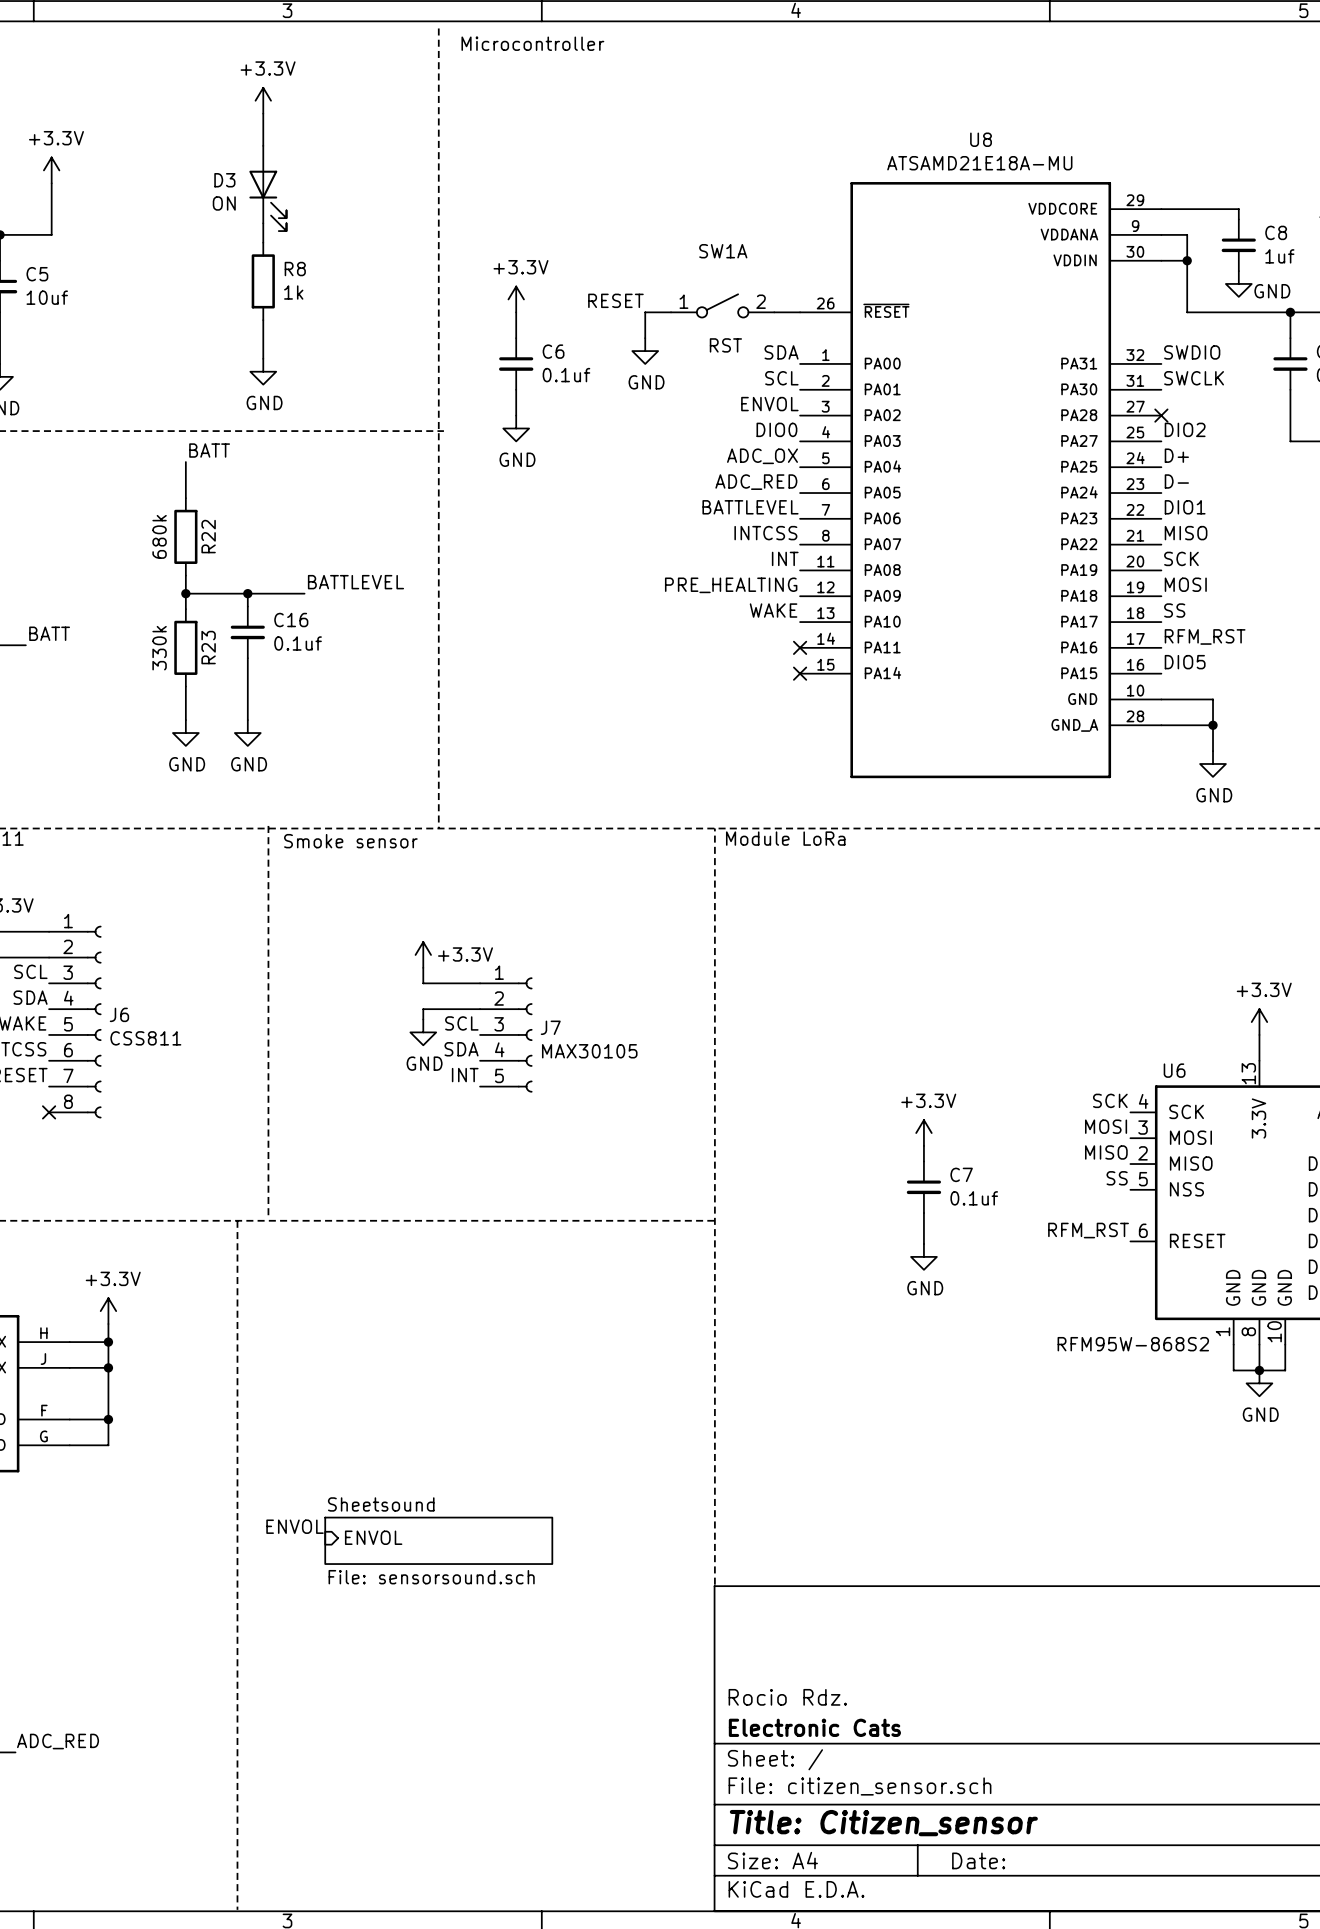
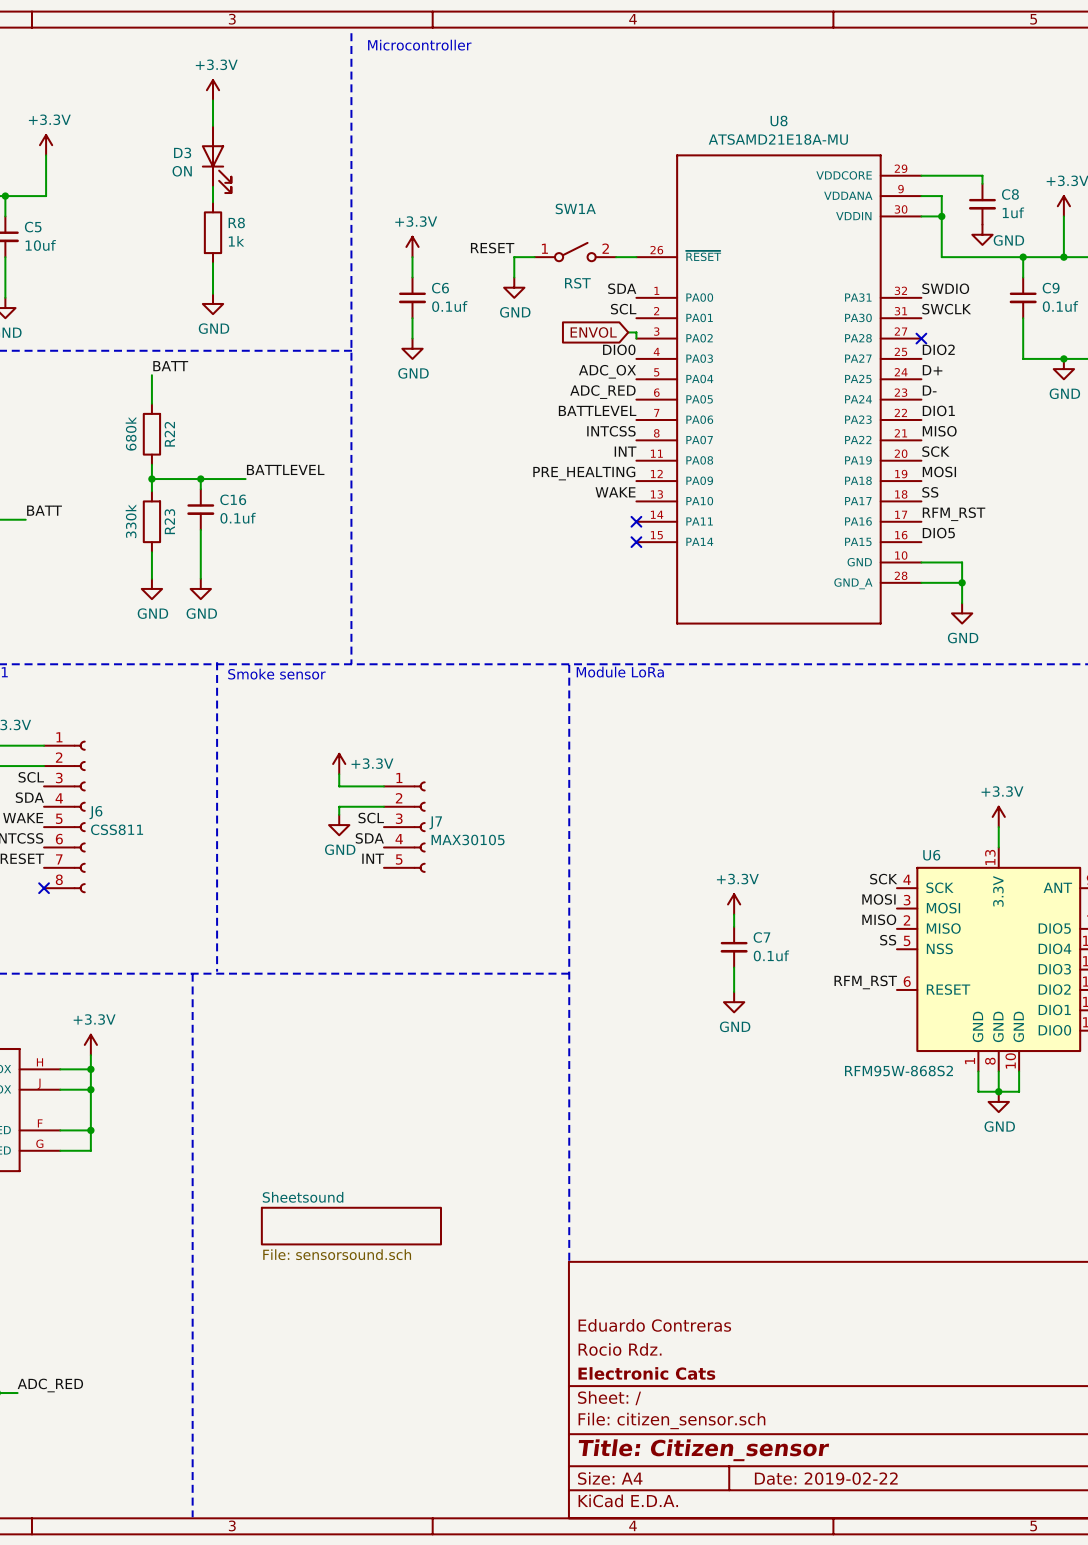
label: ENVOL (769, 404) -> none
global label: none -> ENVOL (593, 332)
wire: none -> (628, 332) (636, 332) (636, 338)
label: ENVOL (295, 1526) -> none
sheet pin: ENVOL (373, 1537) -> none
title block: none -> Eduardo Contreras (654, 1325)
title block: Date: (978, 1860) -> Date: 2019-02-22 (826, 1478)

